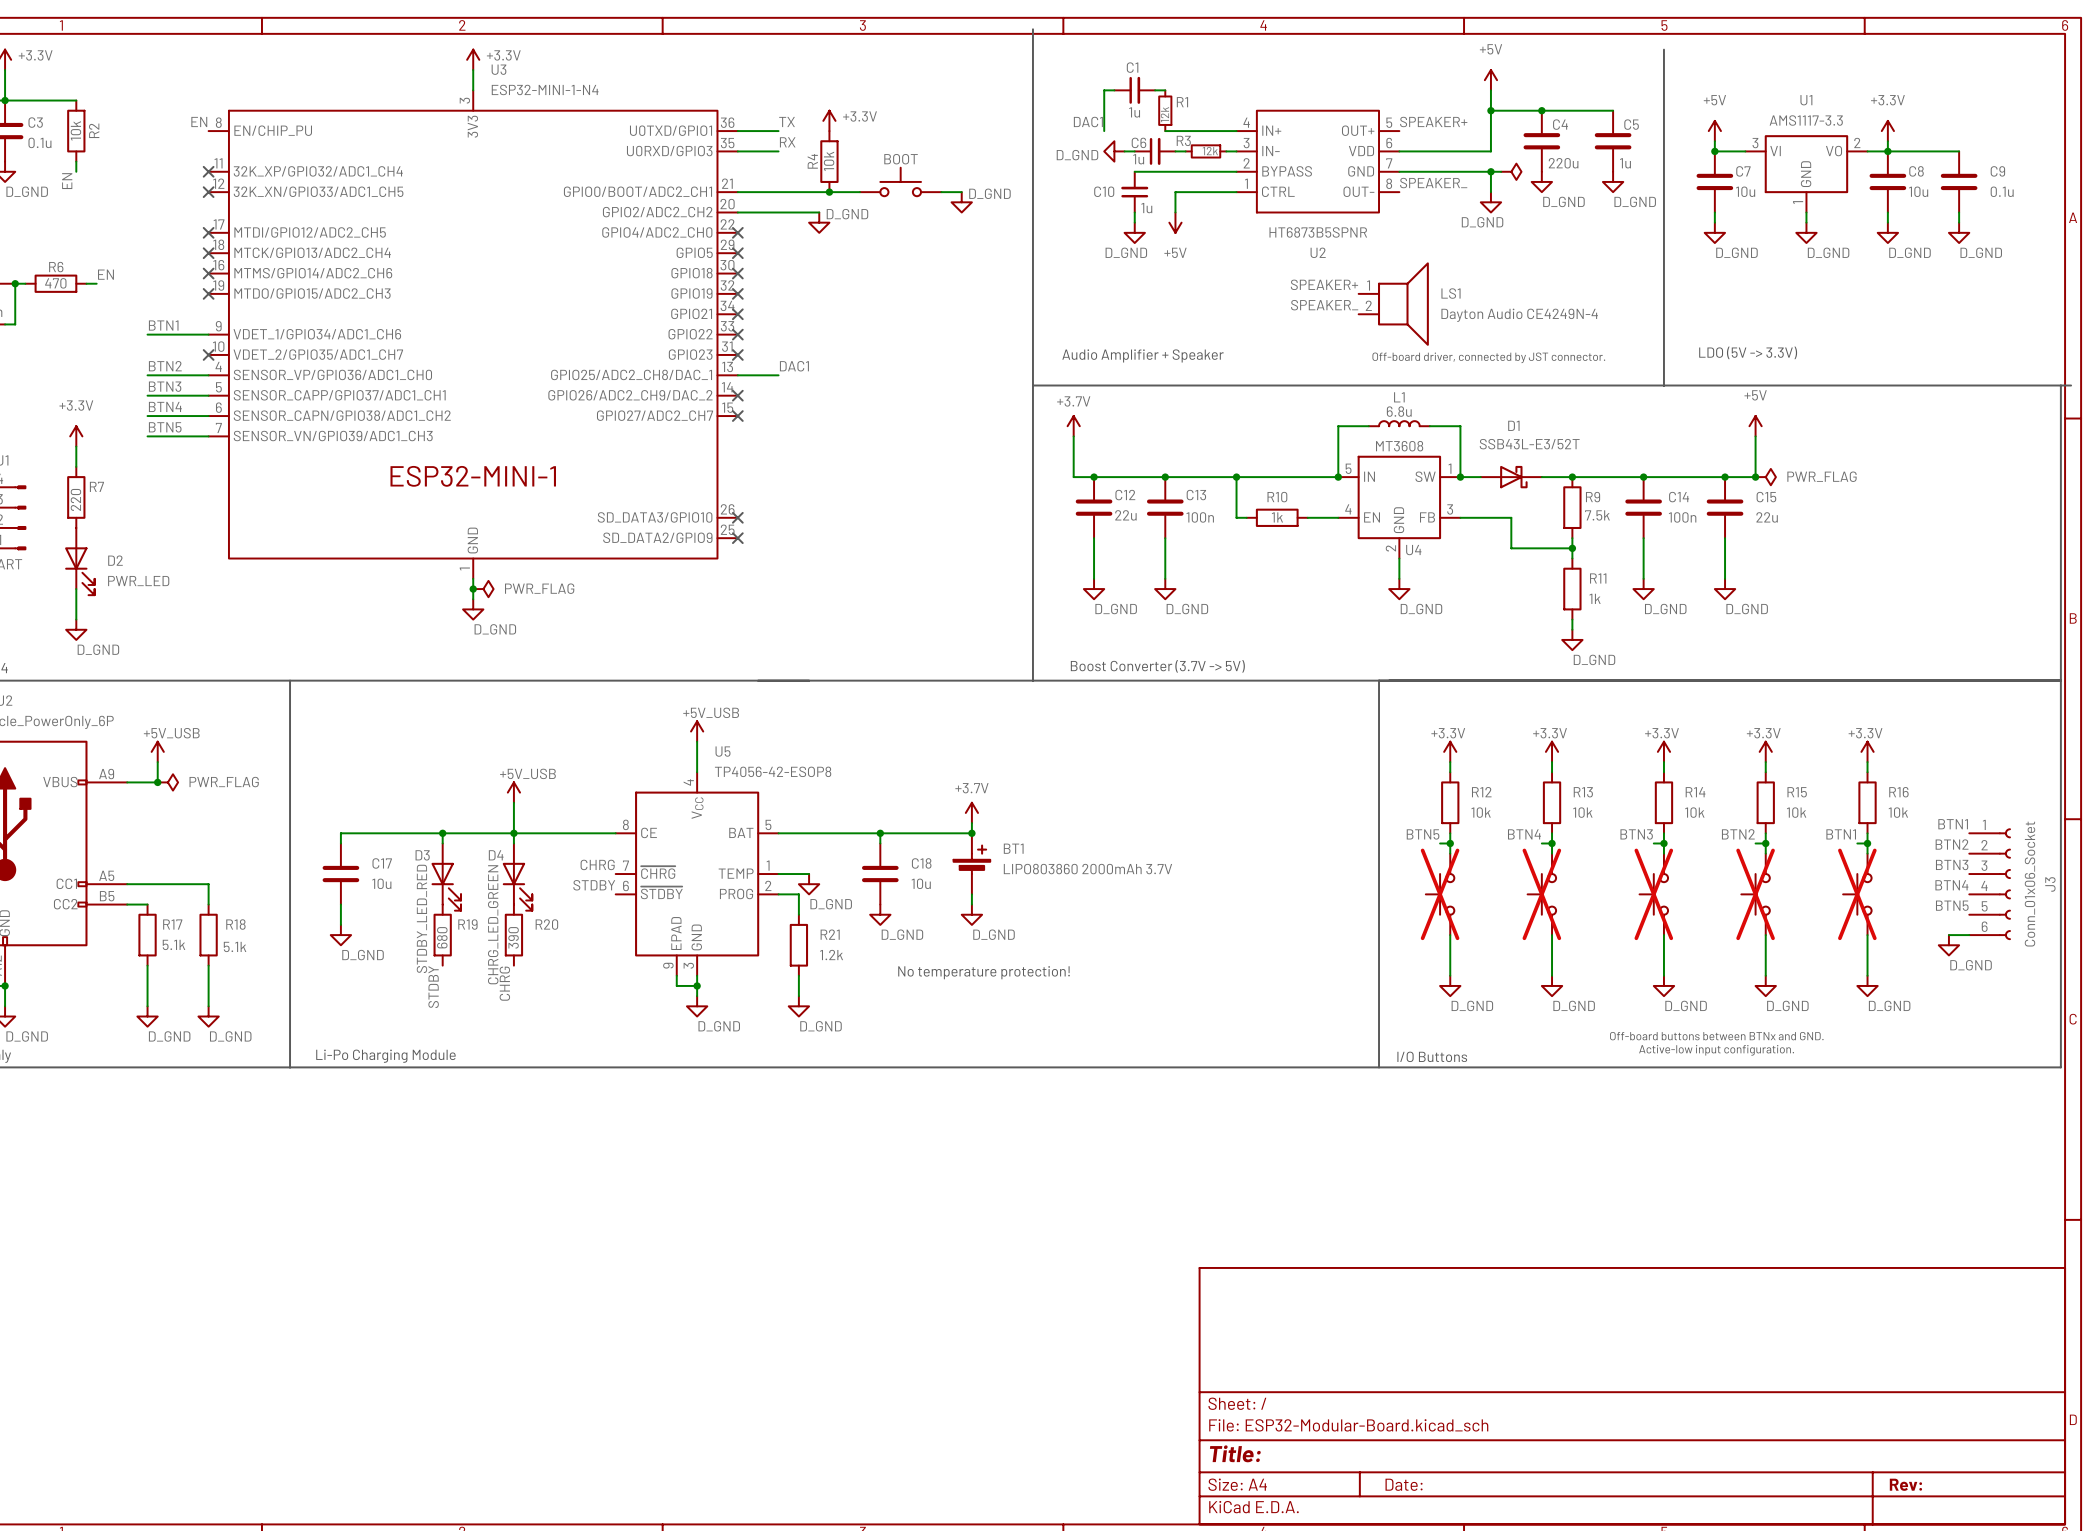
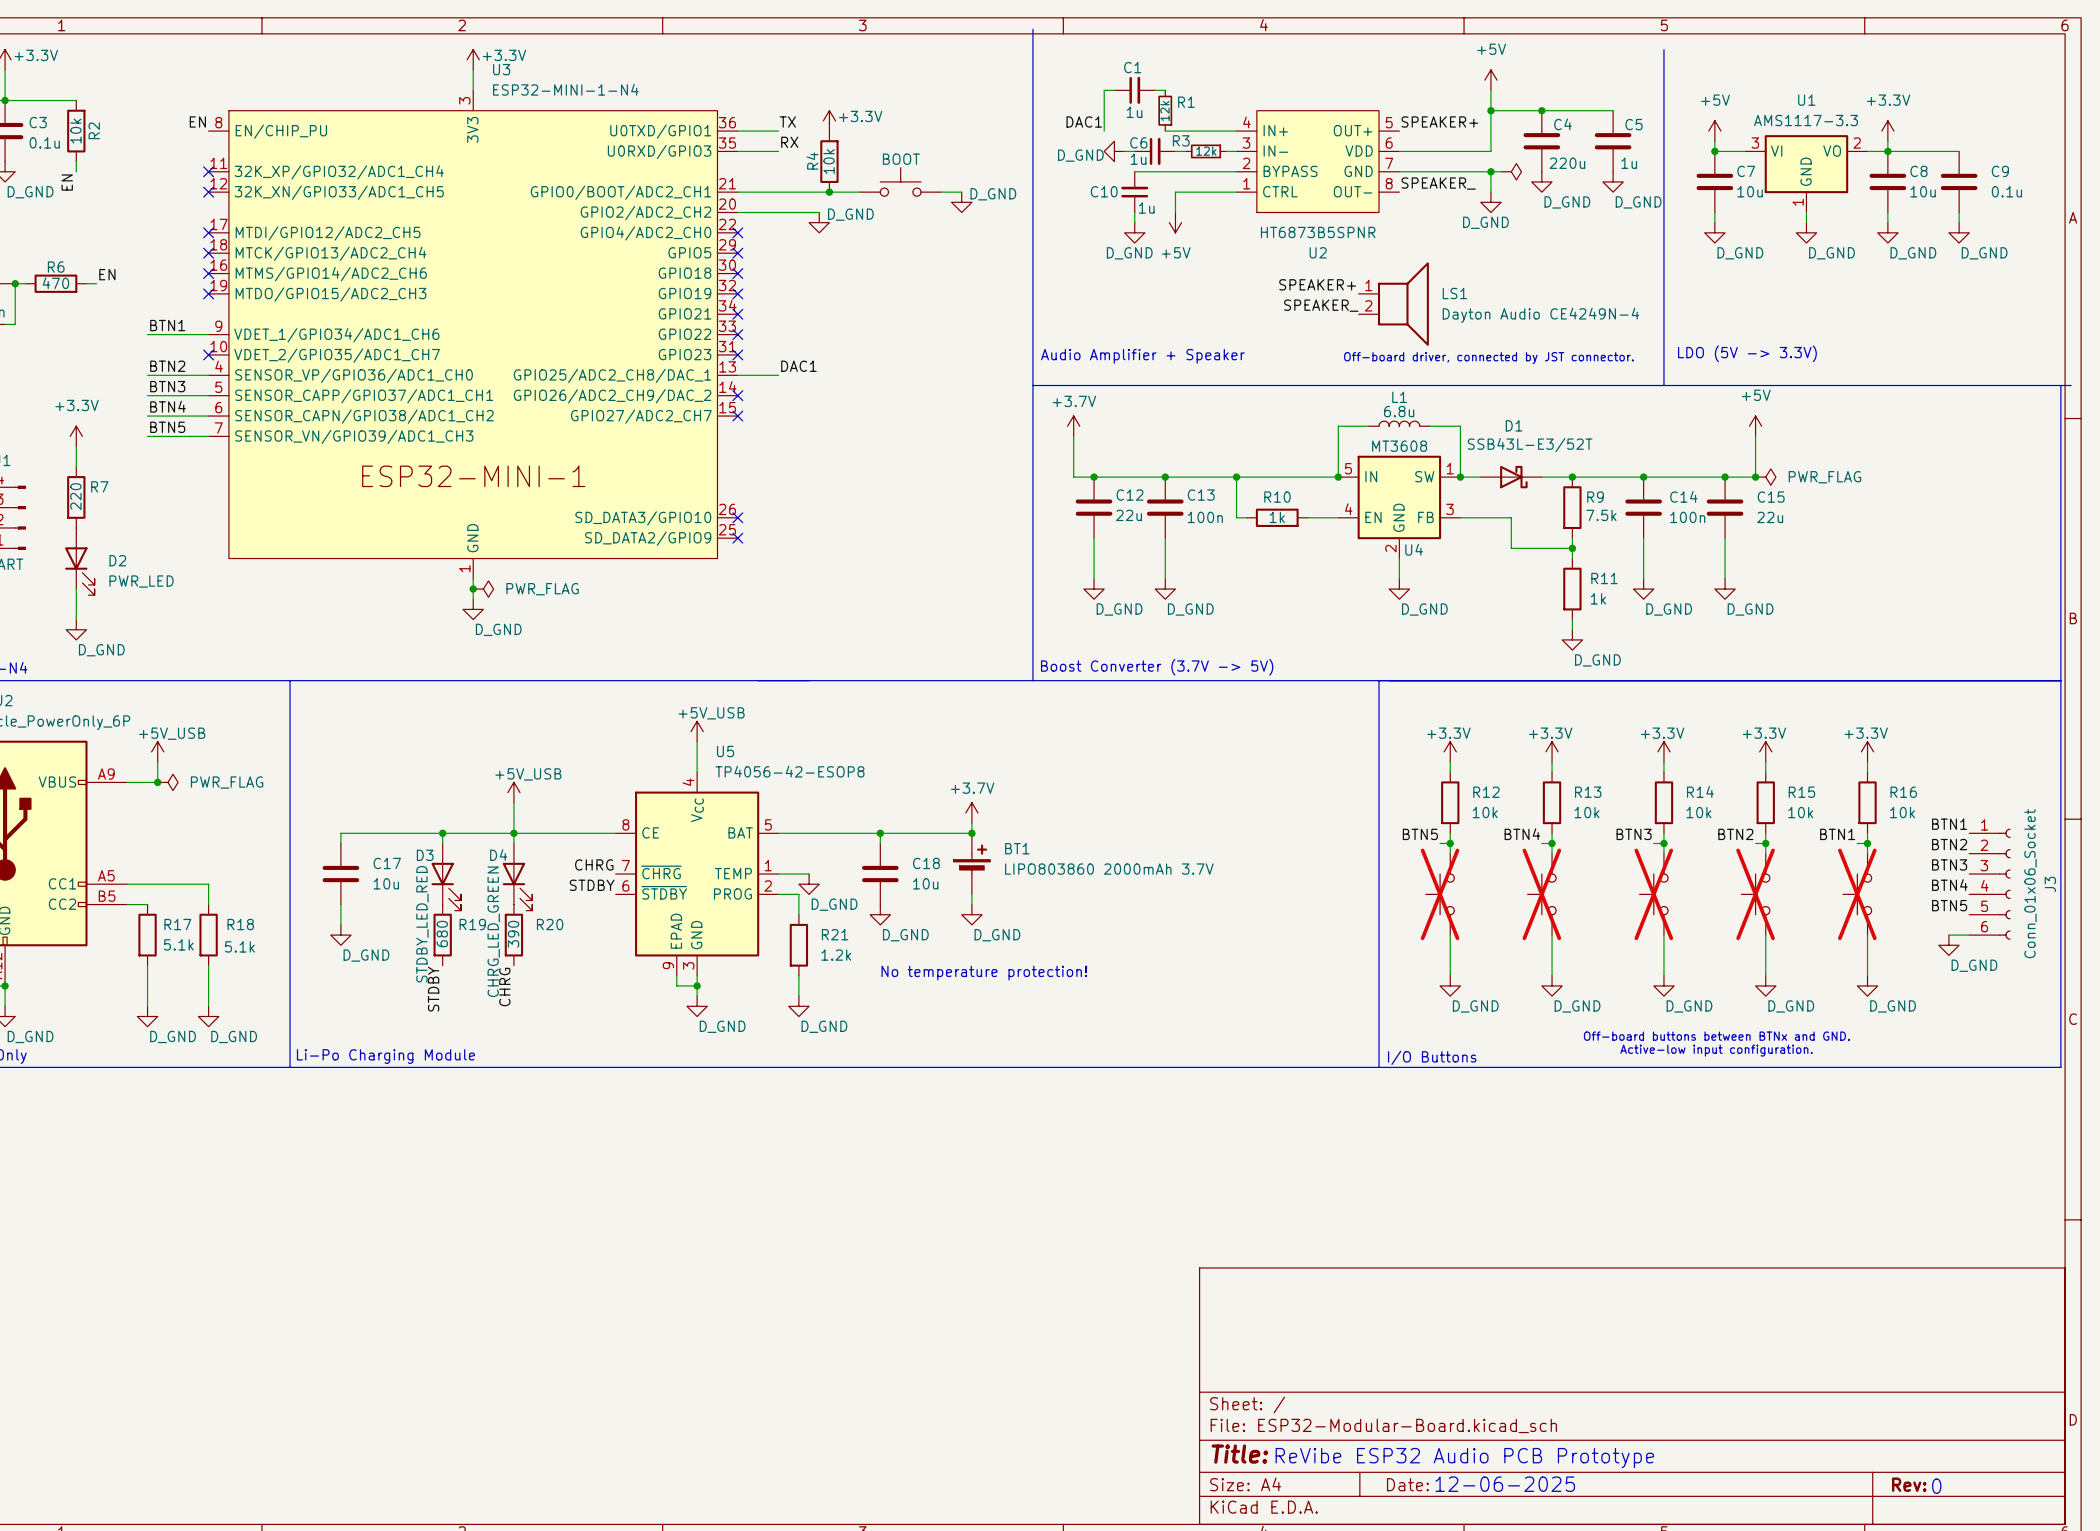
text: none -> ReVibe ESP32 Audio PCB Prototype (1464, 1458)
text: none -> 12-06-2025 (1505, 1484)
text: none -> 0 (1936, 1486)

